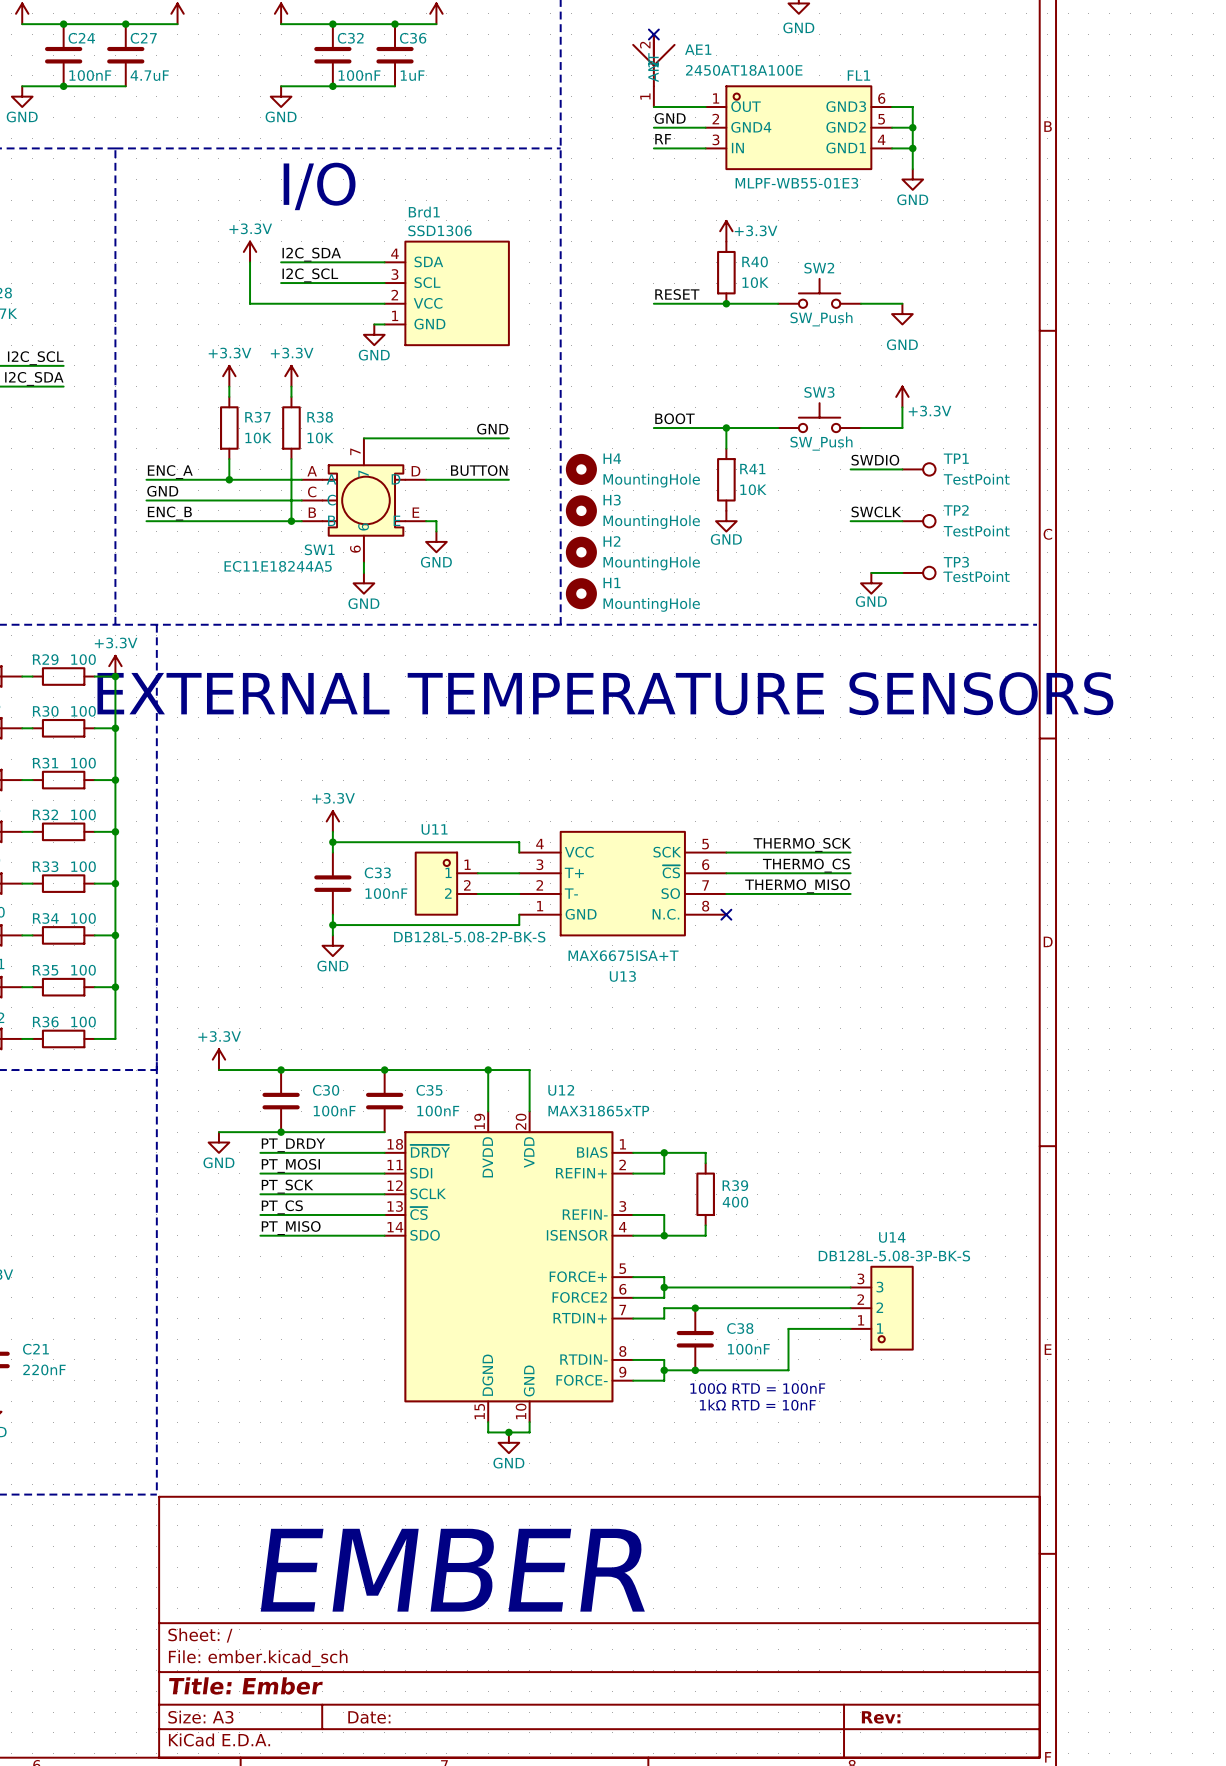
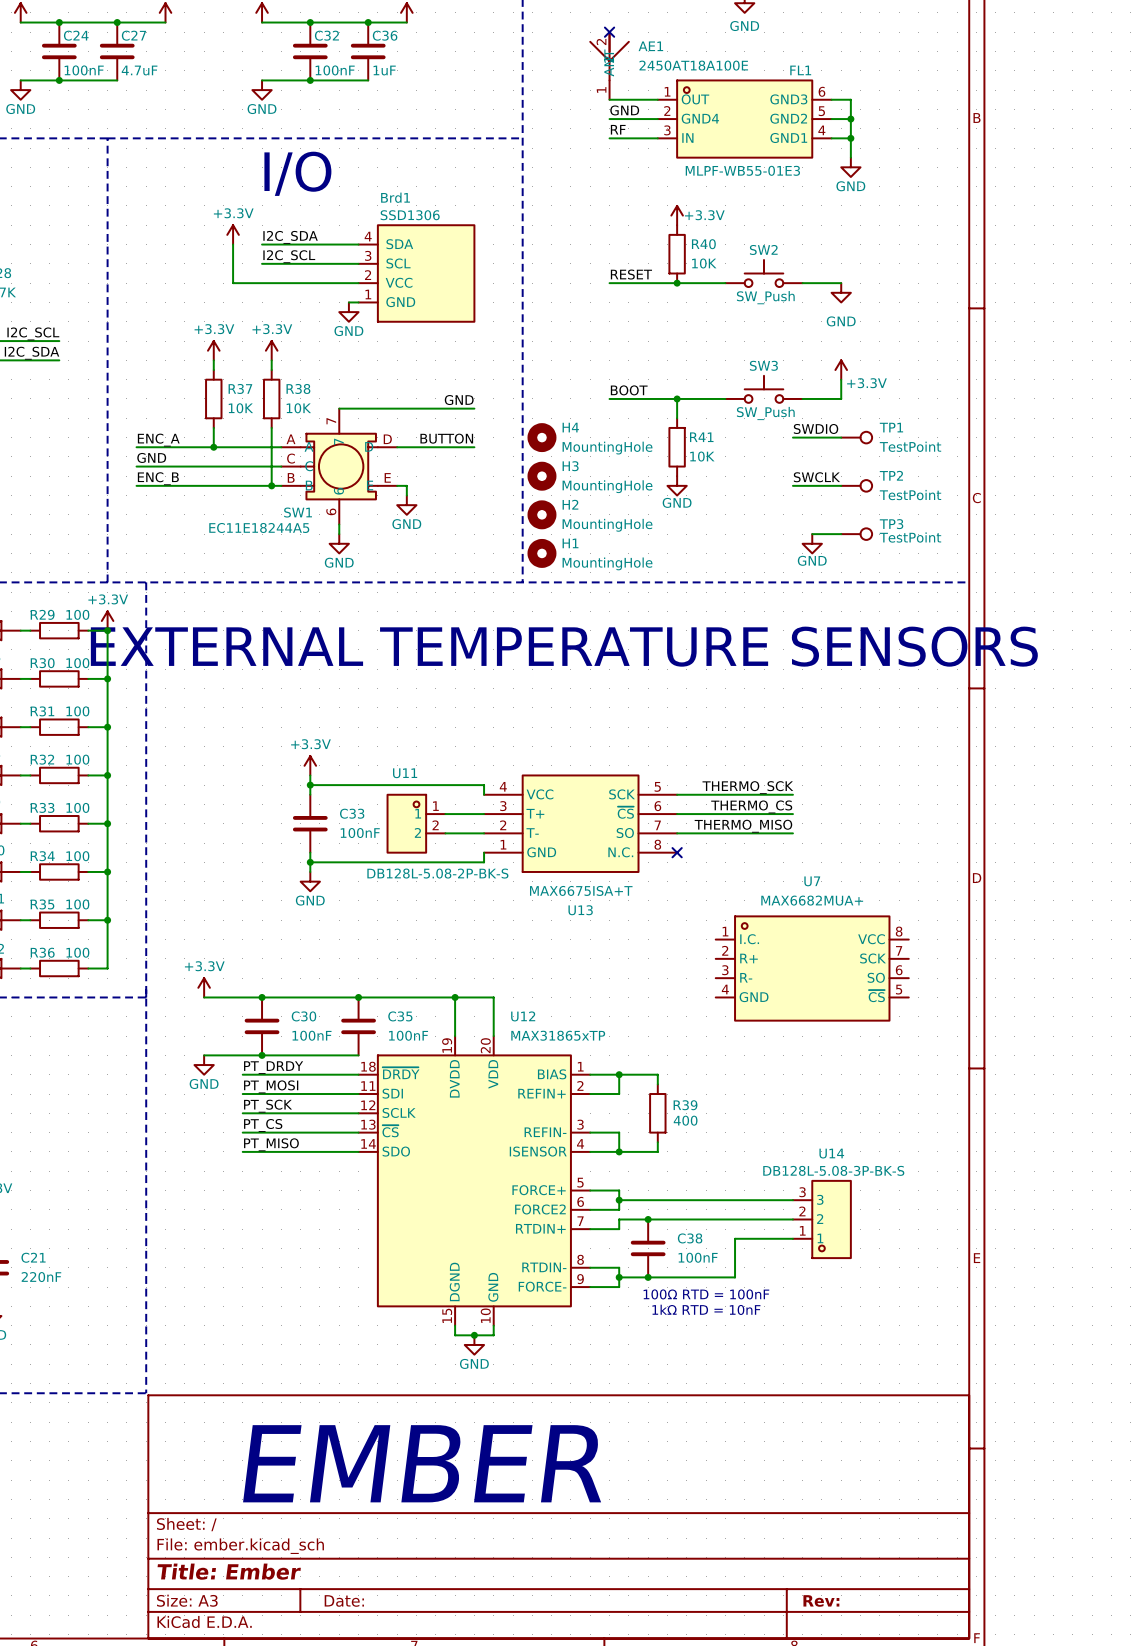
U7: none -> MAX6682MUA+ (812, 968)

